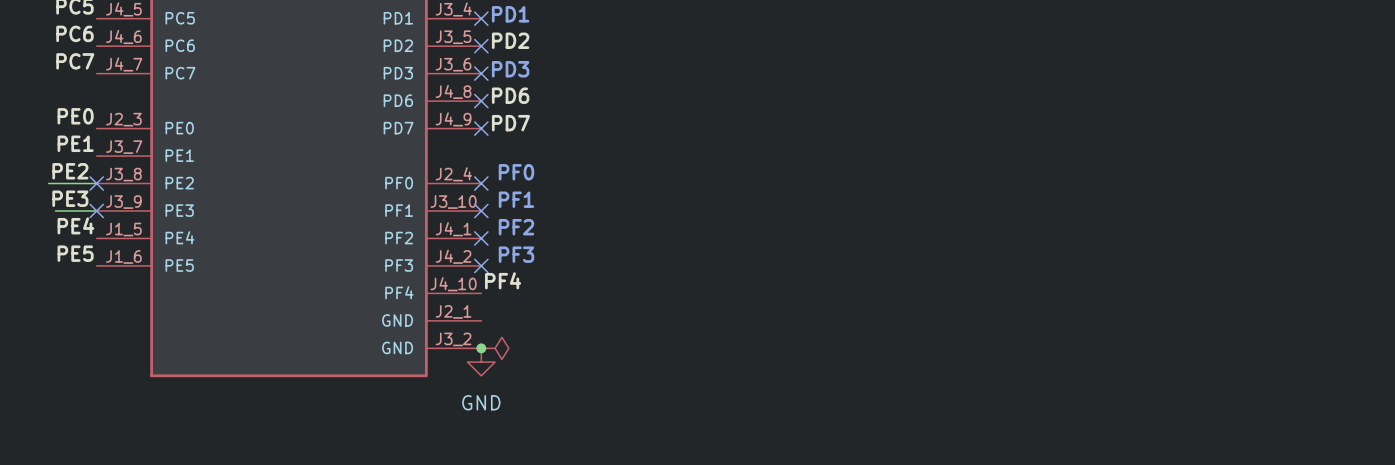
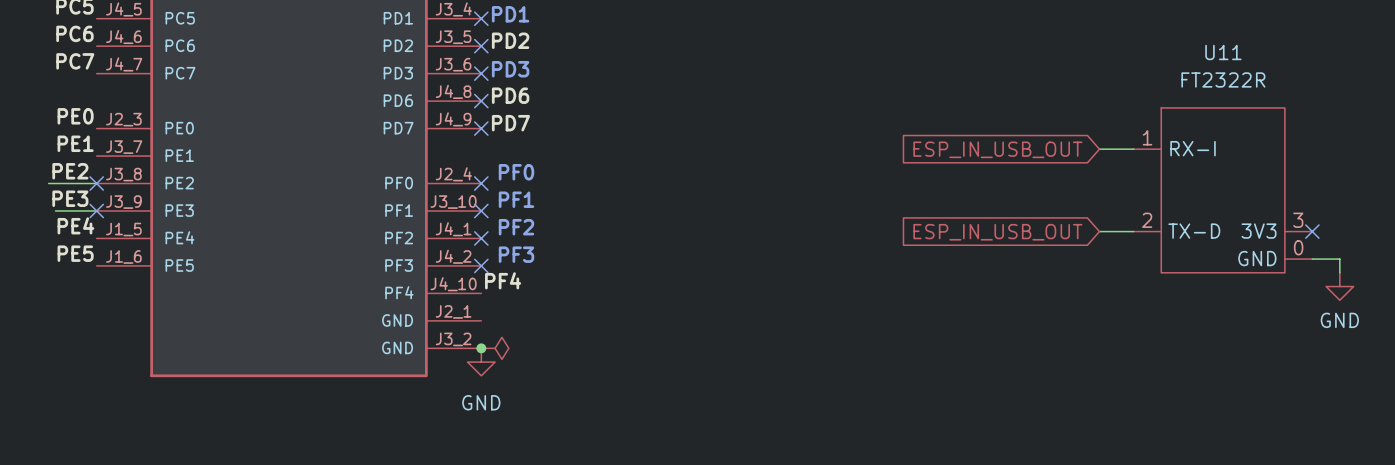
global label: none -> ESP_IN_USB_OUT (997, 149)
wire: none -> (1099, 149) (1133, 149)
U11: none -> FT2322R (1223, 190)
wire: none -> (1099, 231) (1133, 231)
no-connect mark: none -> (1312, 231)
global label: none -> ESP_IN_USB_OUT (997, 232)
wire: none -> (1312, 259) (1339, 259) (1339, 272)
power symbol: none -> GND (1339, 286)

